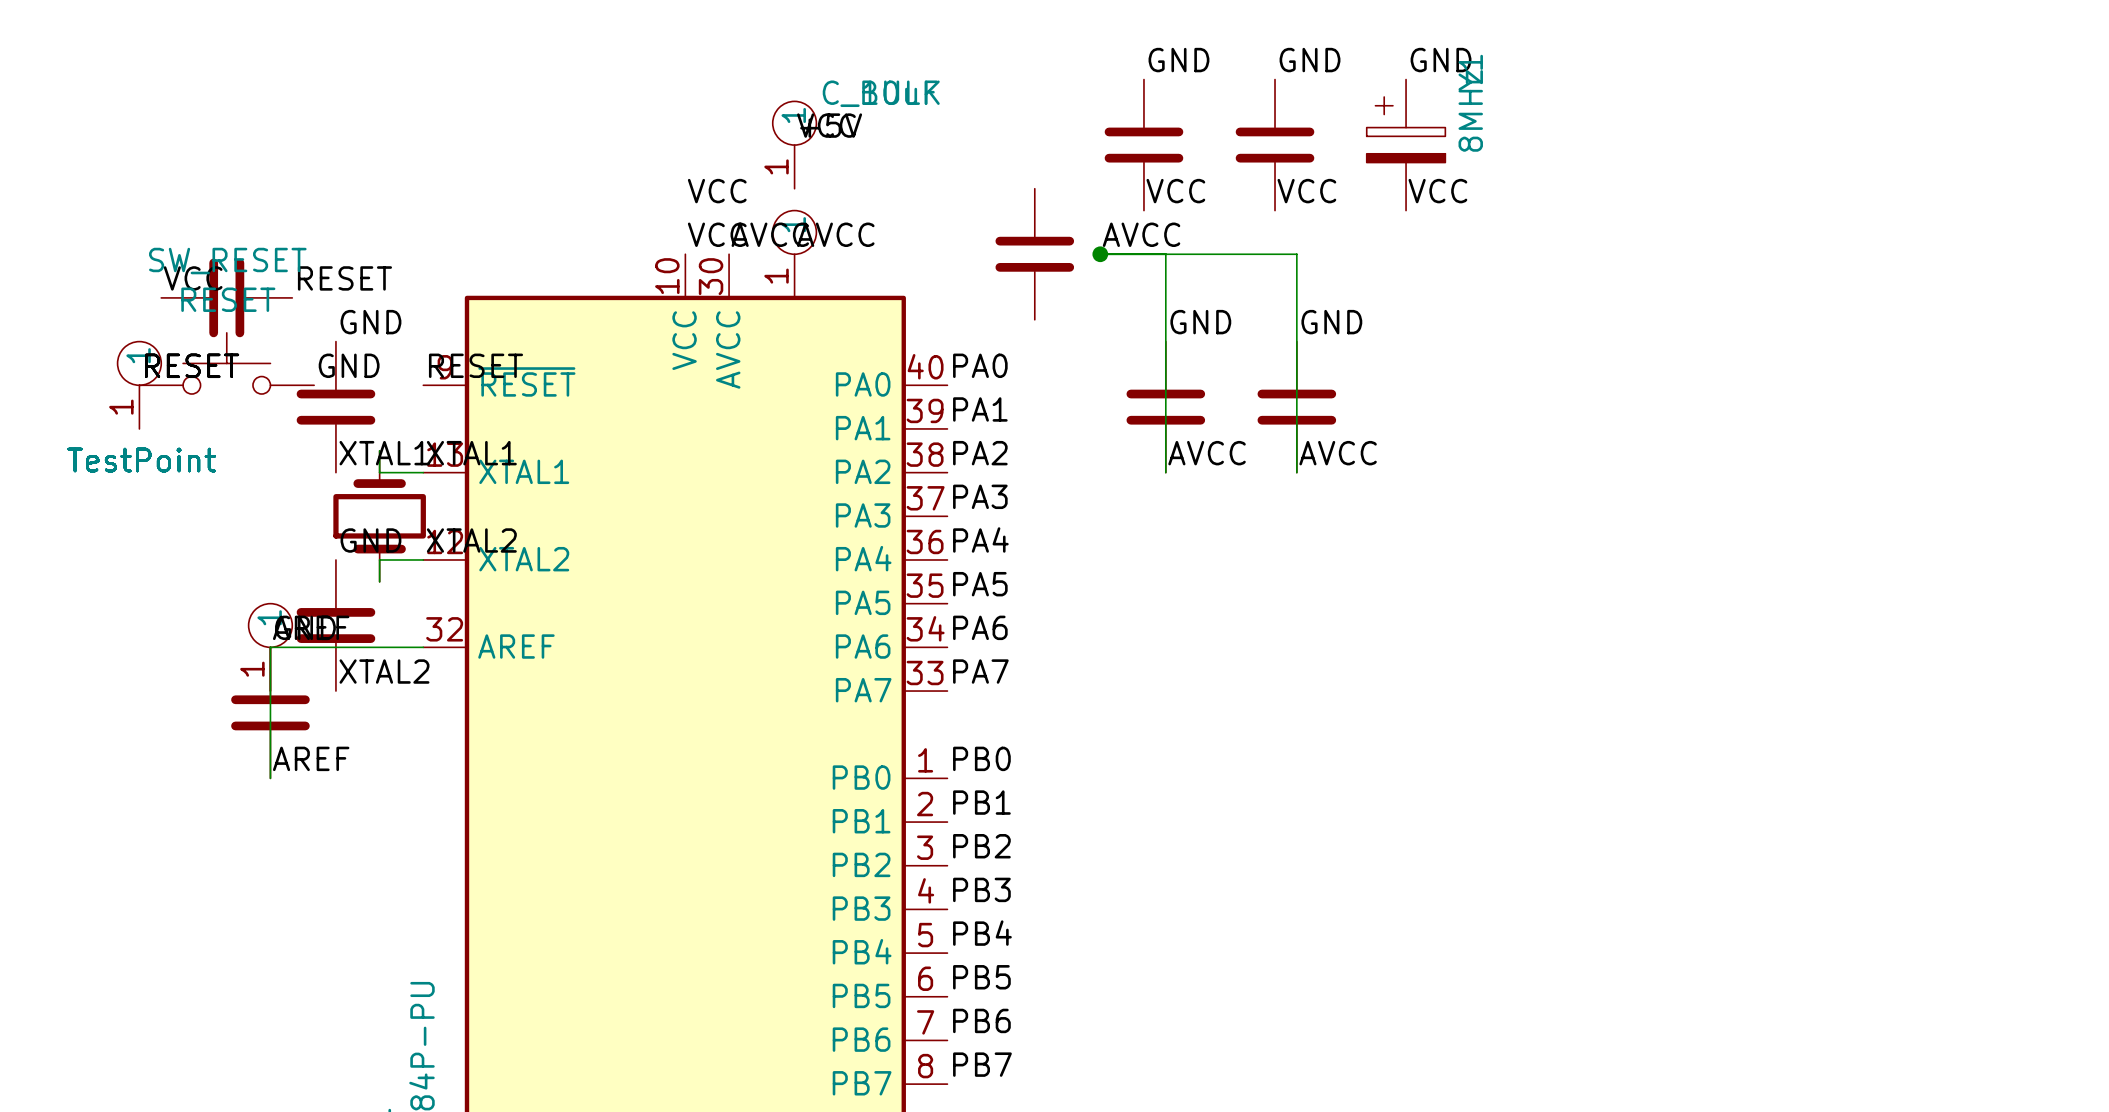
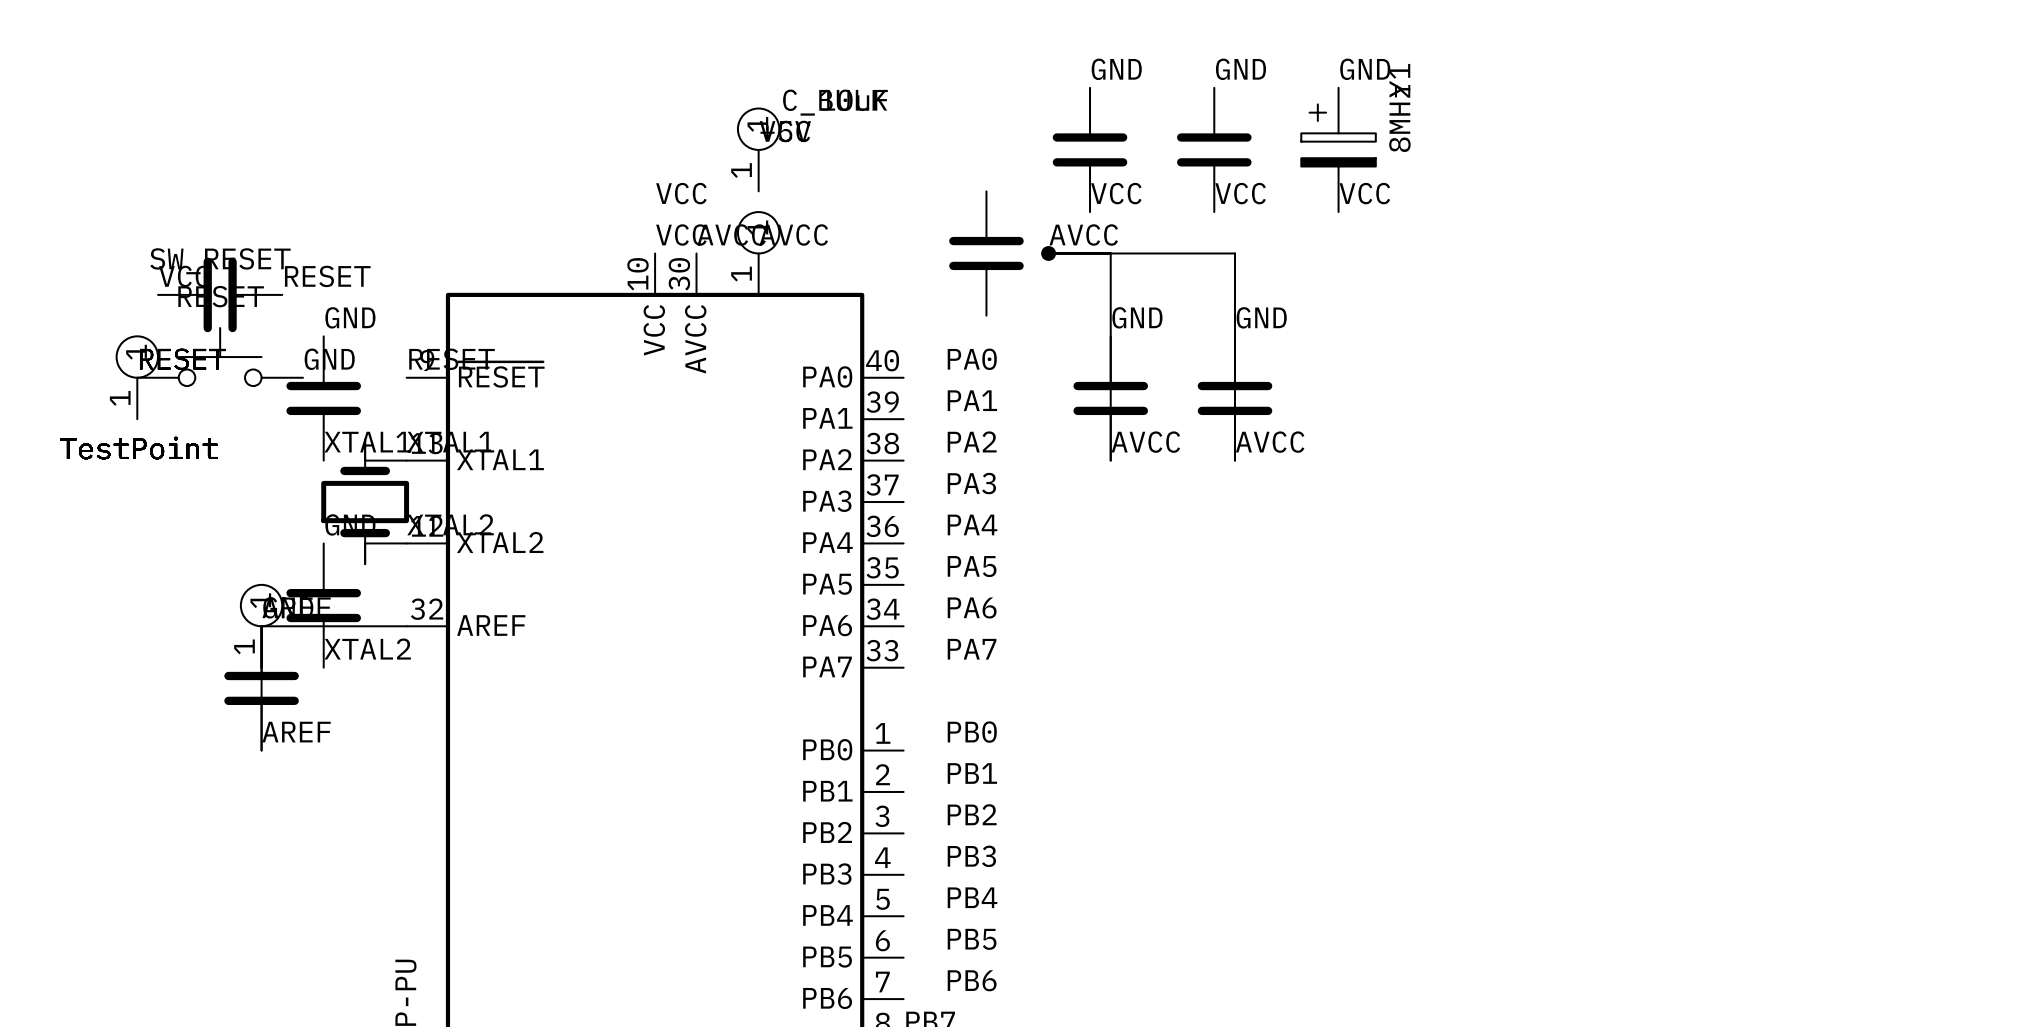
label position: PA0 (980, 365) -> PA0 (972, 359)
label position: PA1 (980, 409) -> PA1 (972, 400)
label position: PA2 (980, 453) -> PA2 (972, 441)
label position: PA3 (980, 496) -> PA3 (971, 483)
label position: PA4 (980, 539) -> PA4 (972, 524)
label position: PA5 (980, 584) -> PA5 (972, 566)
label position: PA6 (980, 627) -> PA6 (972, 607)
label position: PA7 (980, 671) -> PA7 (972, 649)
label position: PB0 (981, 758) -> PB0 (972, 732)
label position: PB1 (981, 802) -> PB1 (972, 773)
label position: PB2 (981, 846) -> PB2 (972, 814)
label position: PB3 (981, 889) -> PB3 (971, 856)
label position: PB4 (982, 933) -> PB4 (972, 897)
label position: PB5 (981, 977) -> PB5 (972, 939)
label position: PB6 (981, 1020) -> PB6 (972, 980)

